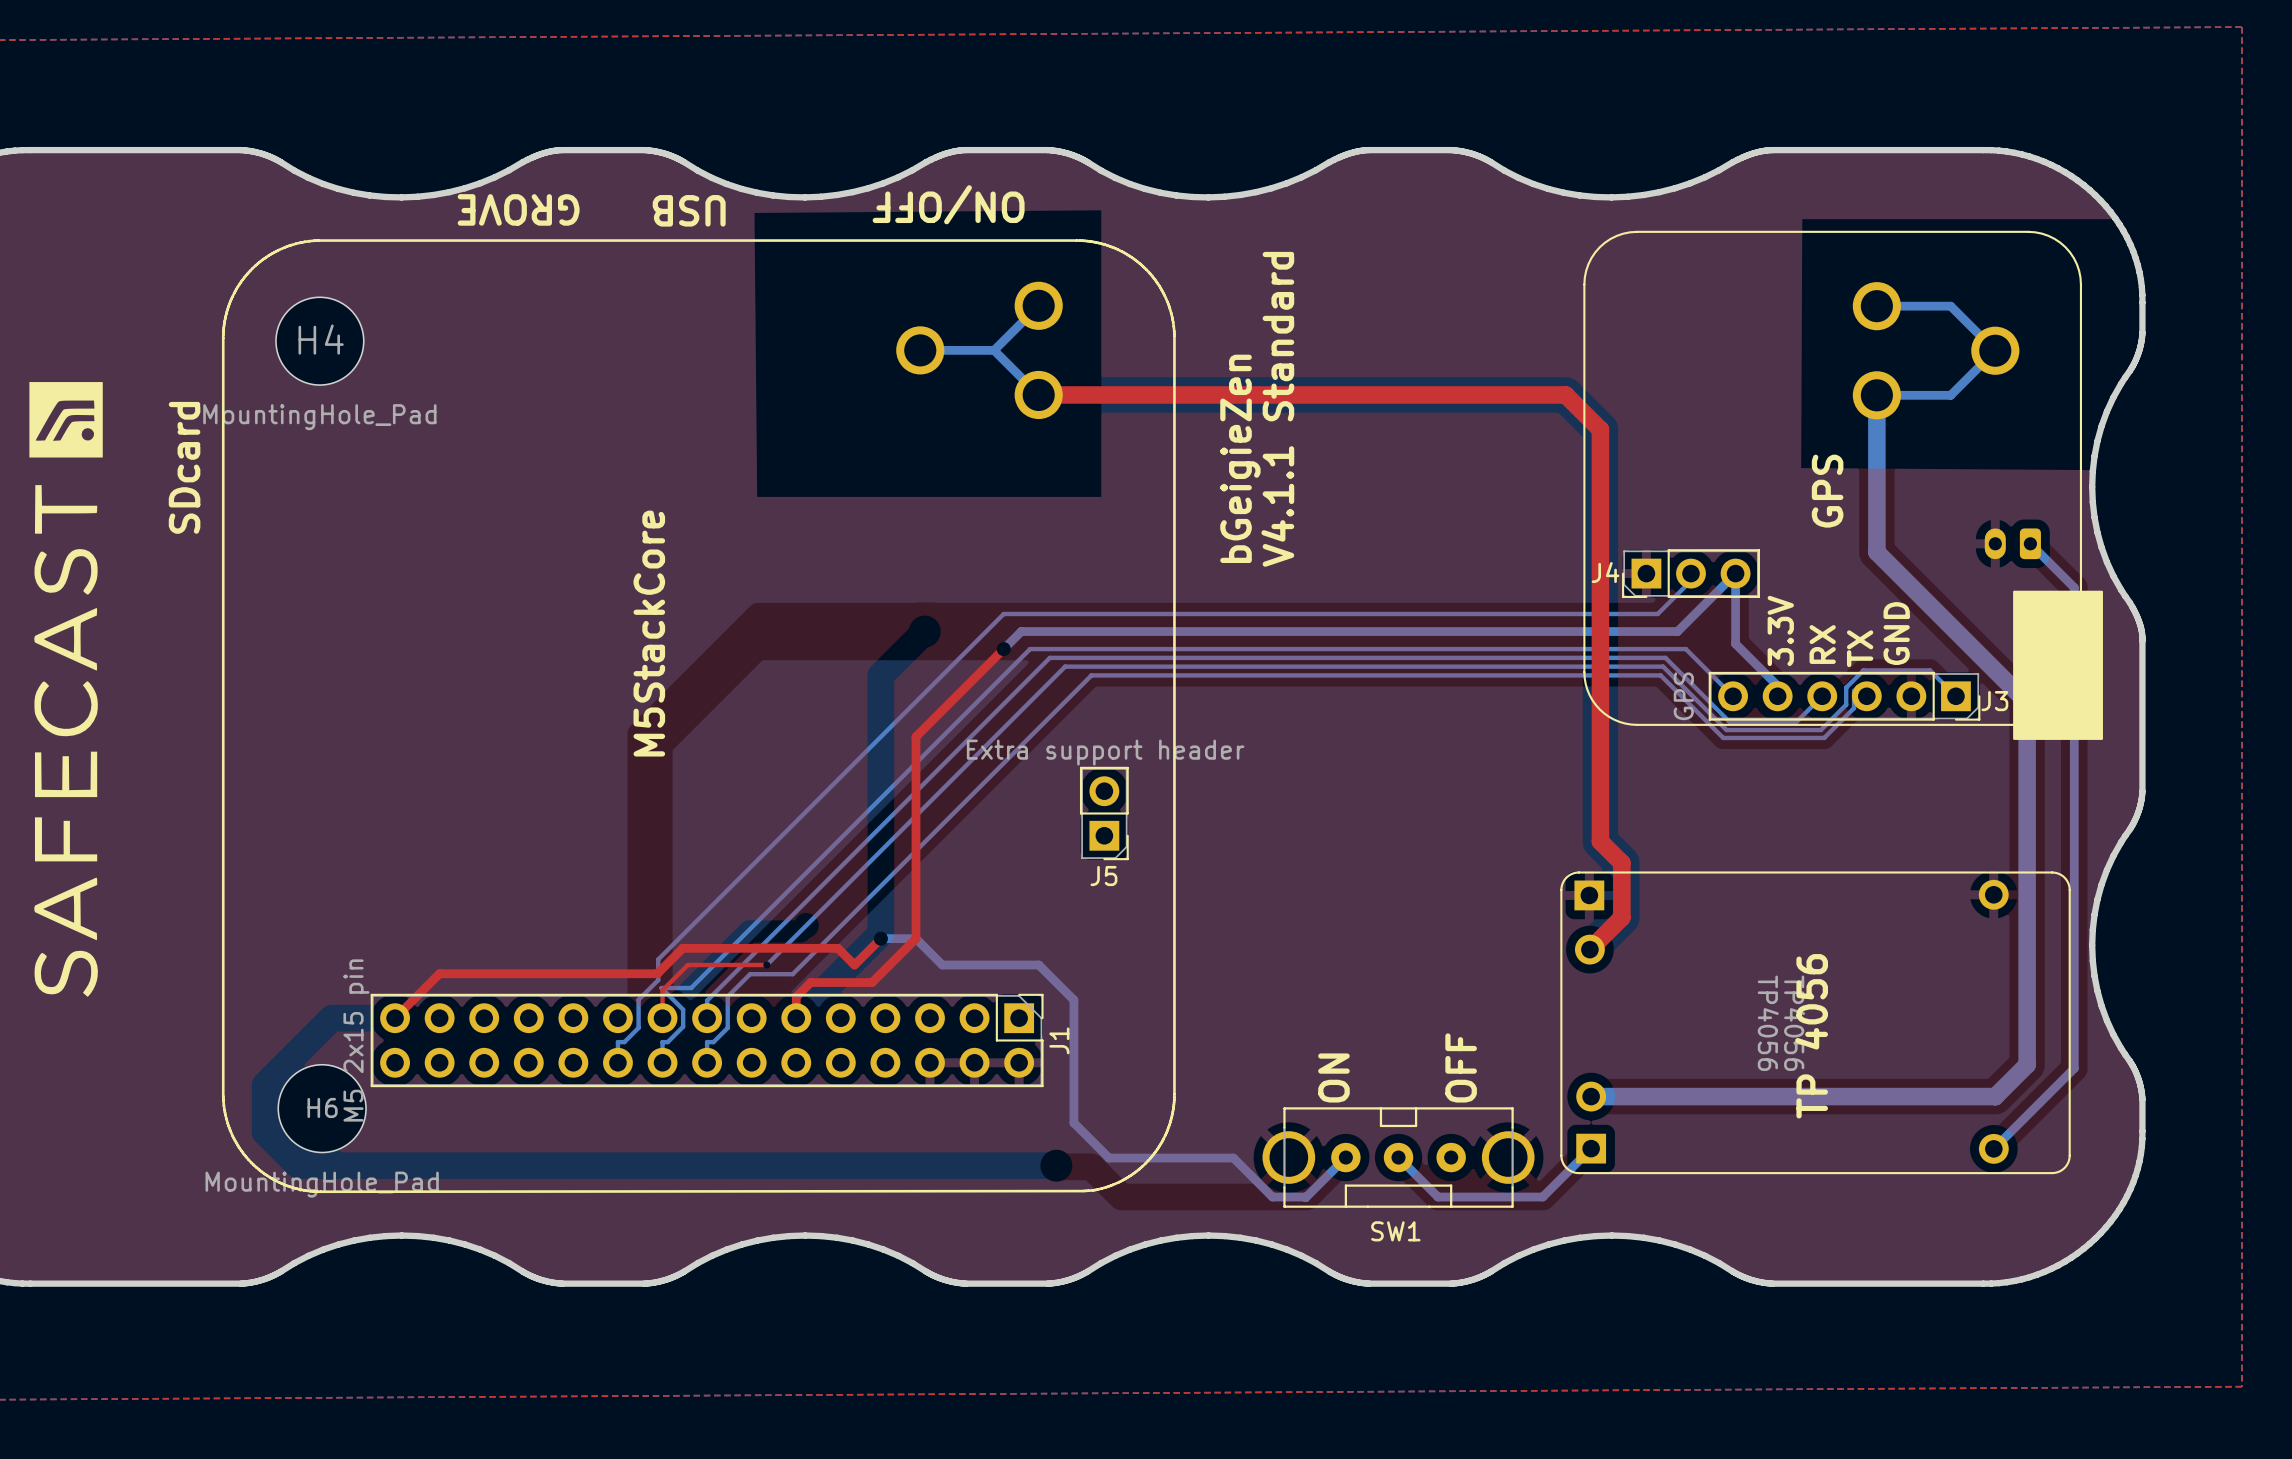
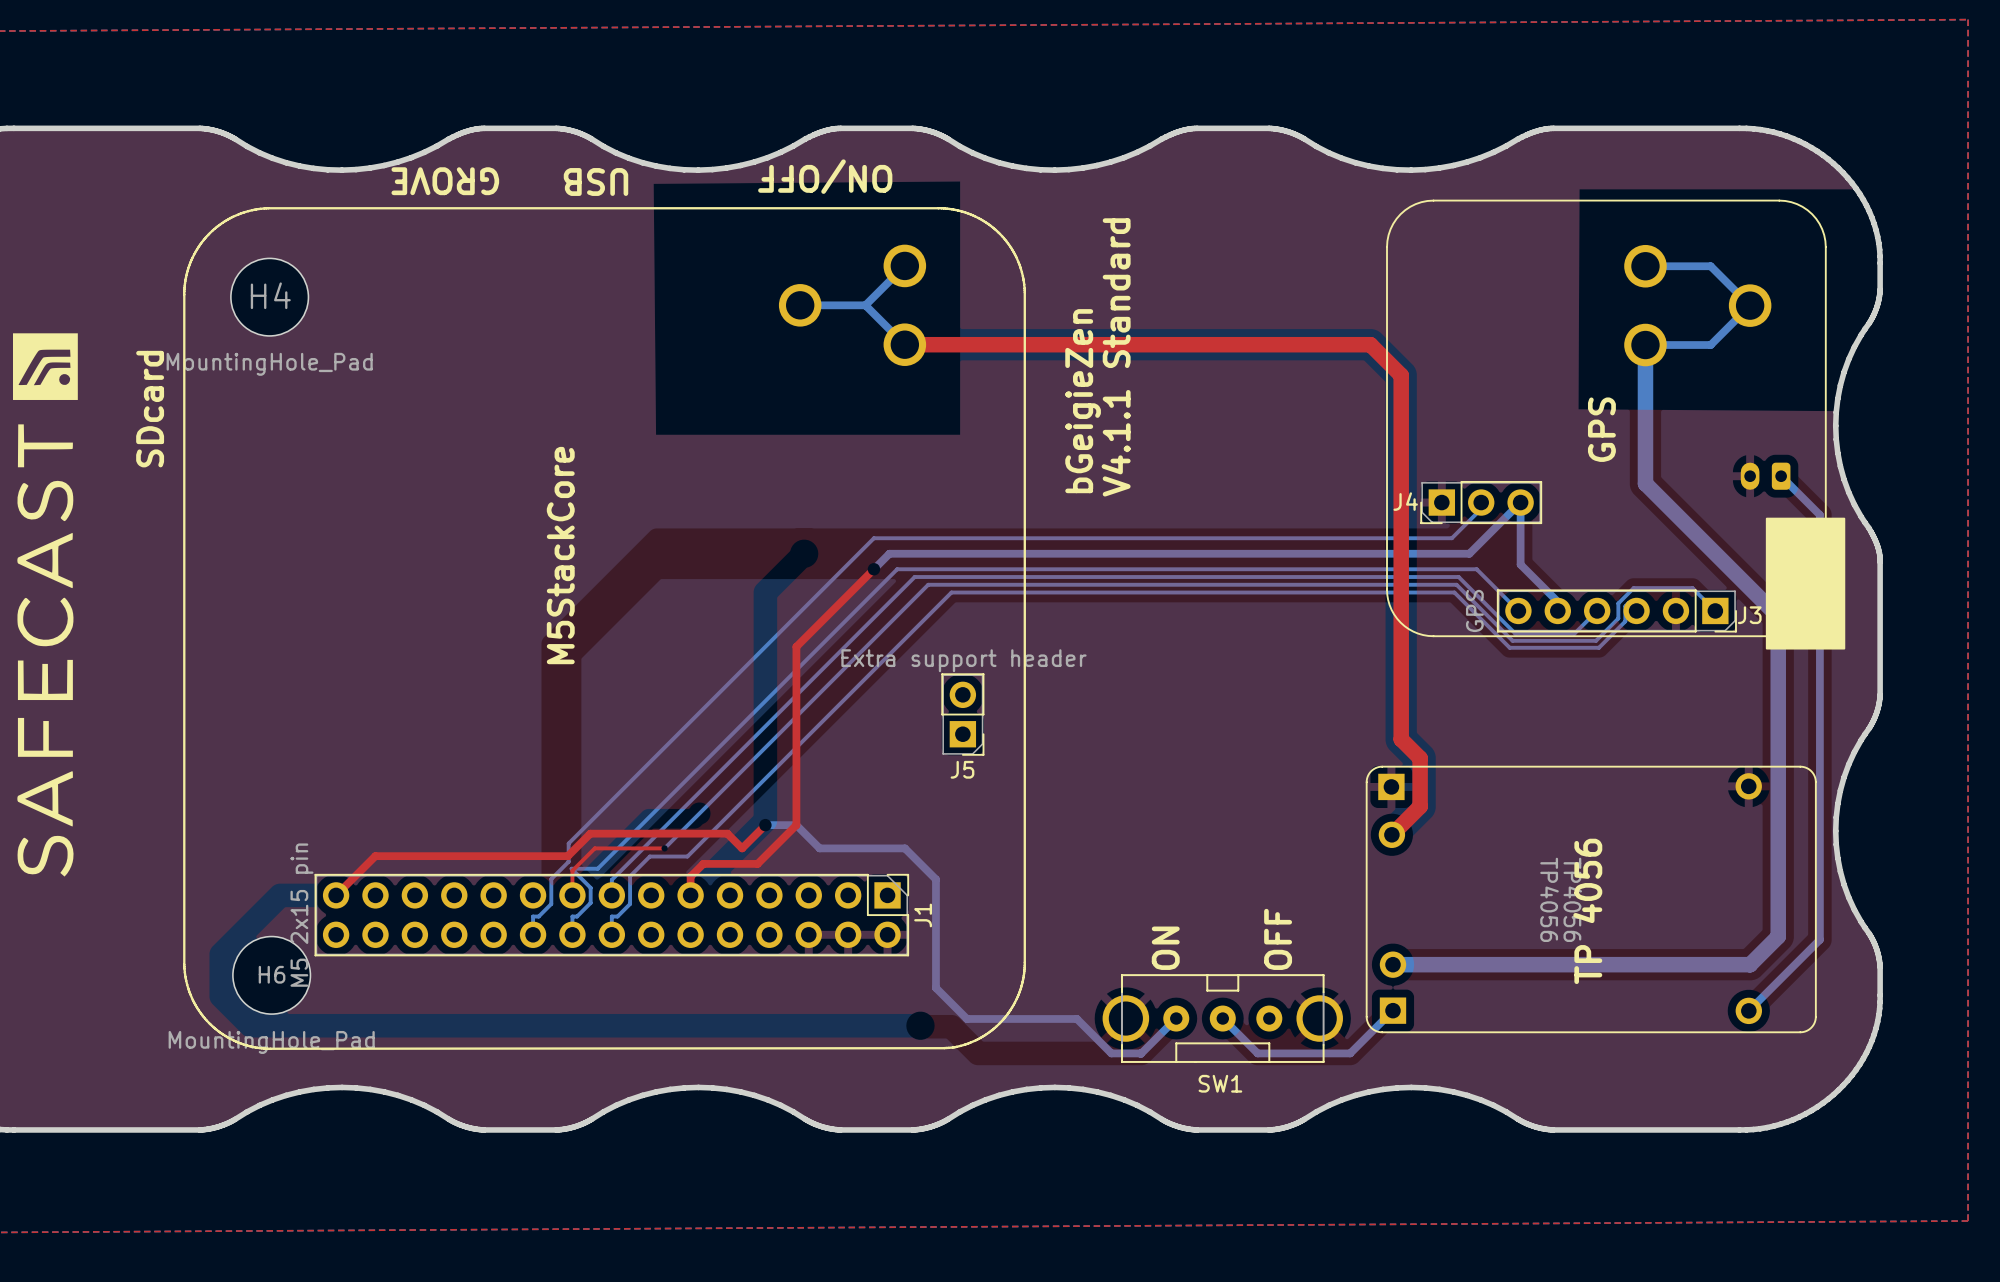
text: 3.3V (1780, 630) -> none
text: GND (1896, 633) -> none
text: RX (1822, 644) -> none
text: TX (1860, 648) -> none

